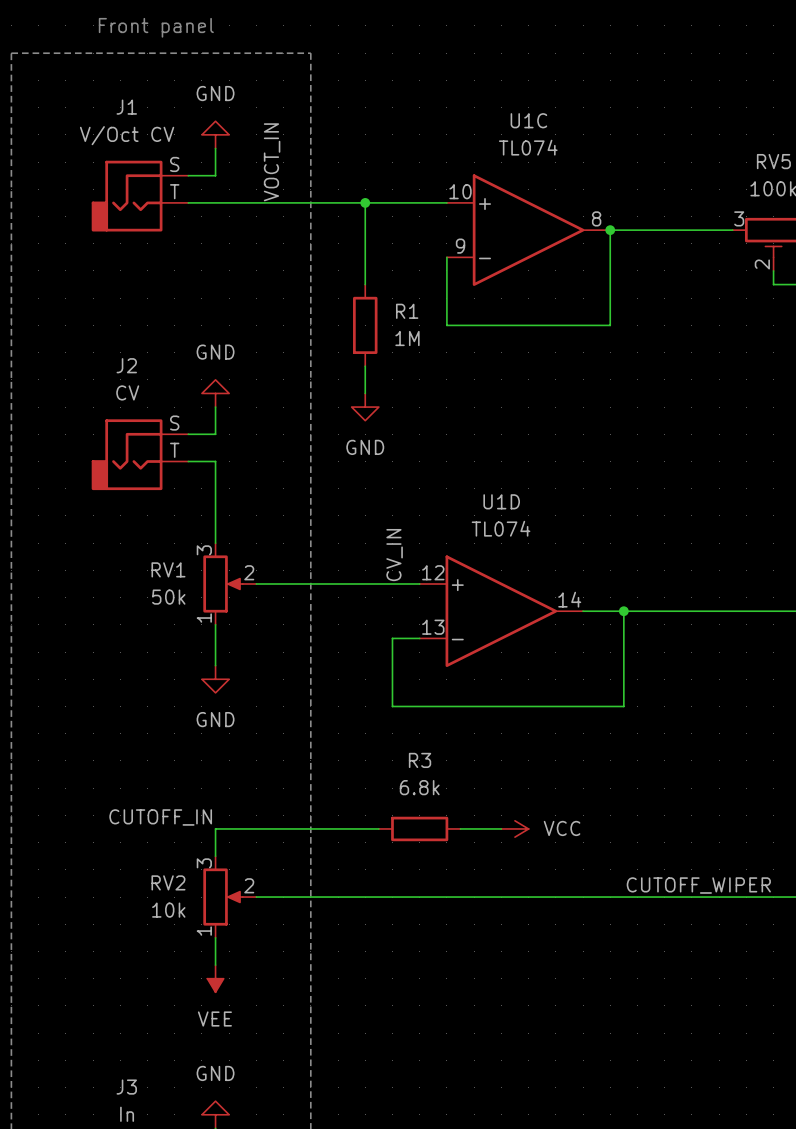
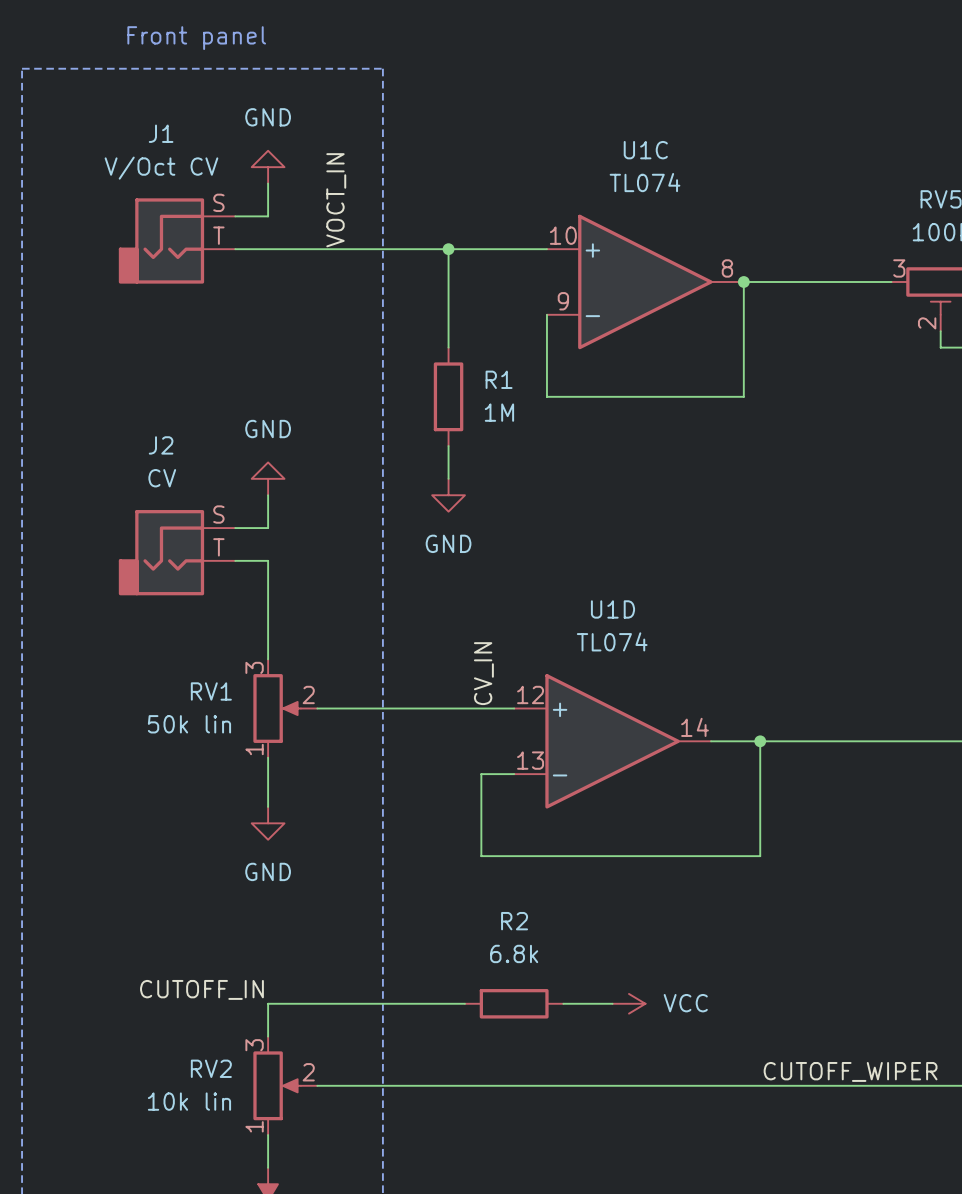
RV1 value: 50k (168, 597) -> 50k lin (189, 724)
R3 name: R3 (420, 760) -> R2 (514, 921)
RV2 value: 10k (168, 910) -> 10k lin (189, 1101)

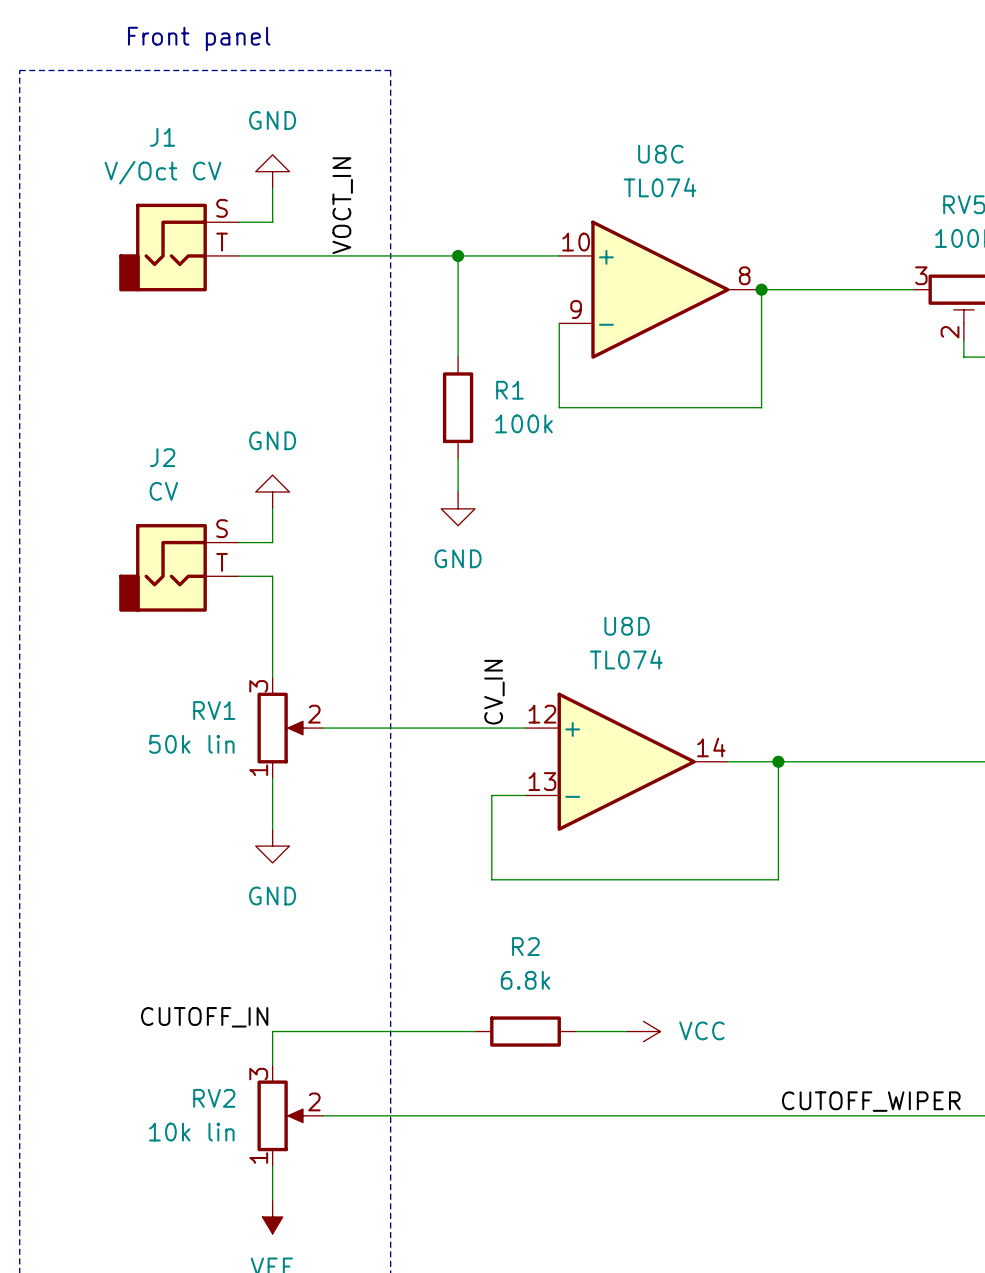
U1C name: U1C (645, 150) -> U8C (660, 154)
R1 value: 1M (499, 412) -> 100k (524, 423)
U1D name: U1D (612, 609) -> U8D (627, 626)

